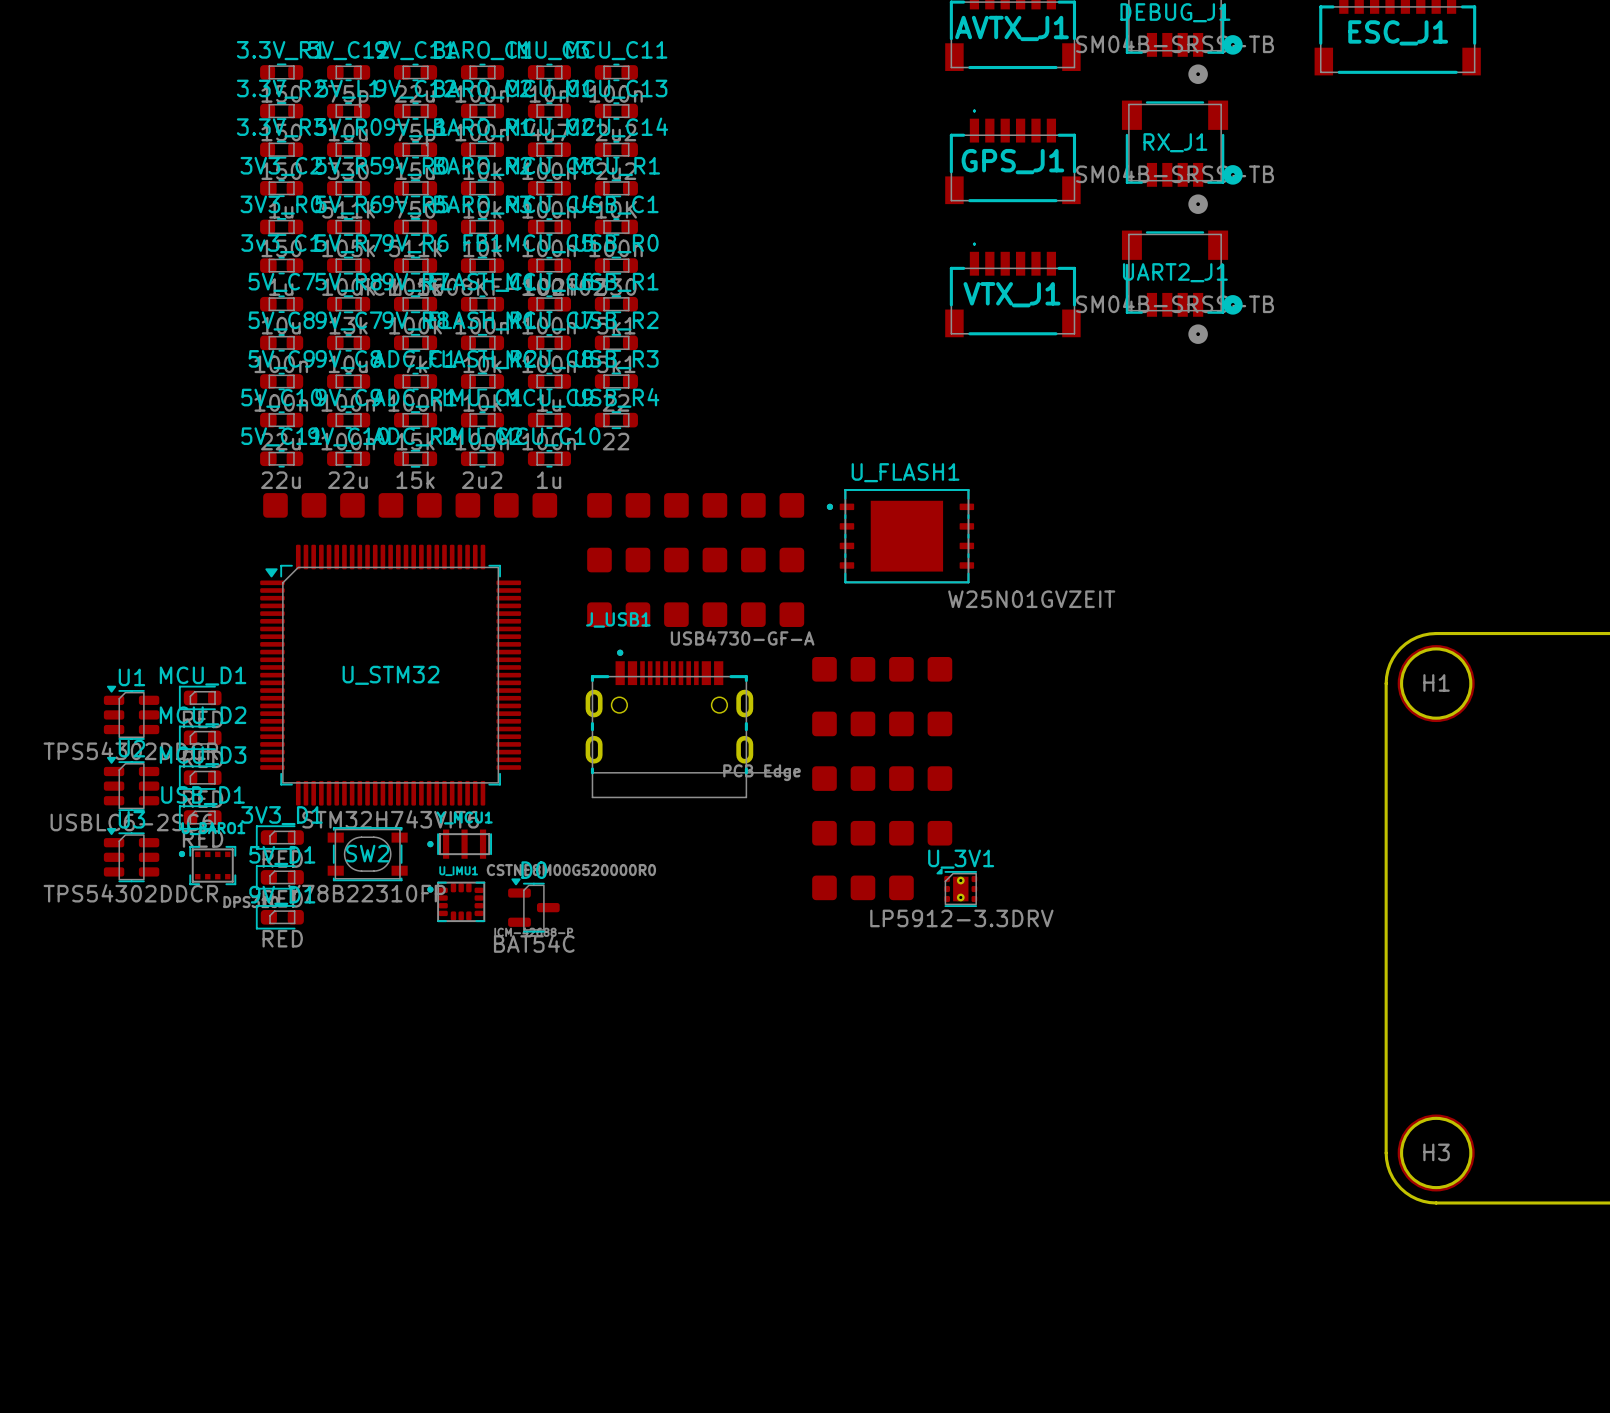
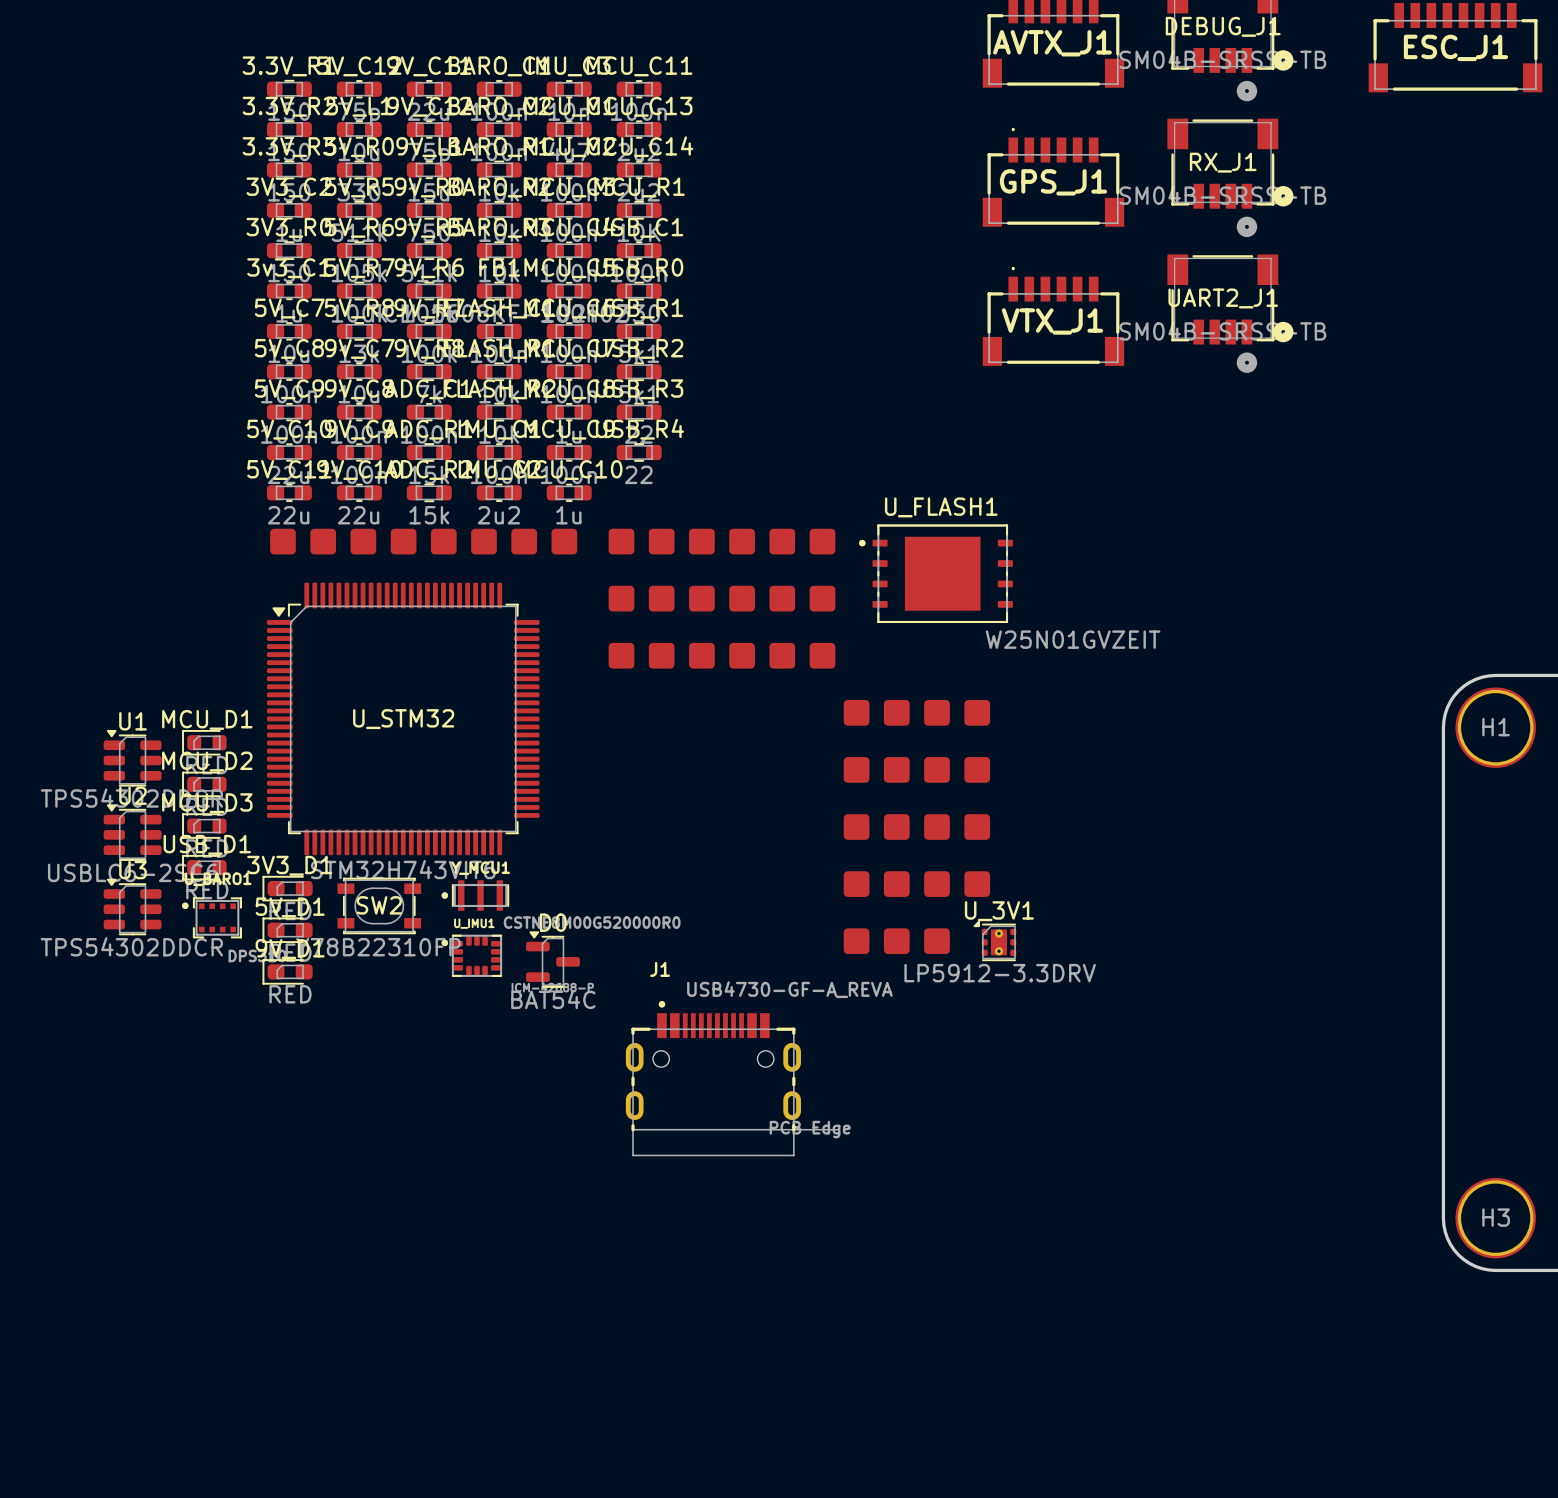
J_USB1: USB4730-GF-A (687, 723) -> none
J1: none -> USB4730-GF-A_REVA (732, 1078)

